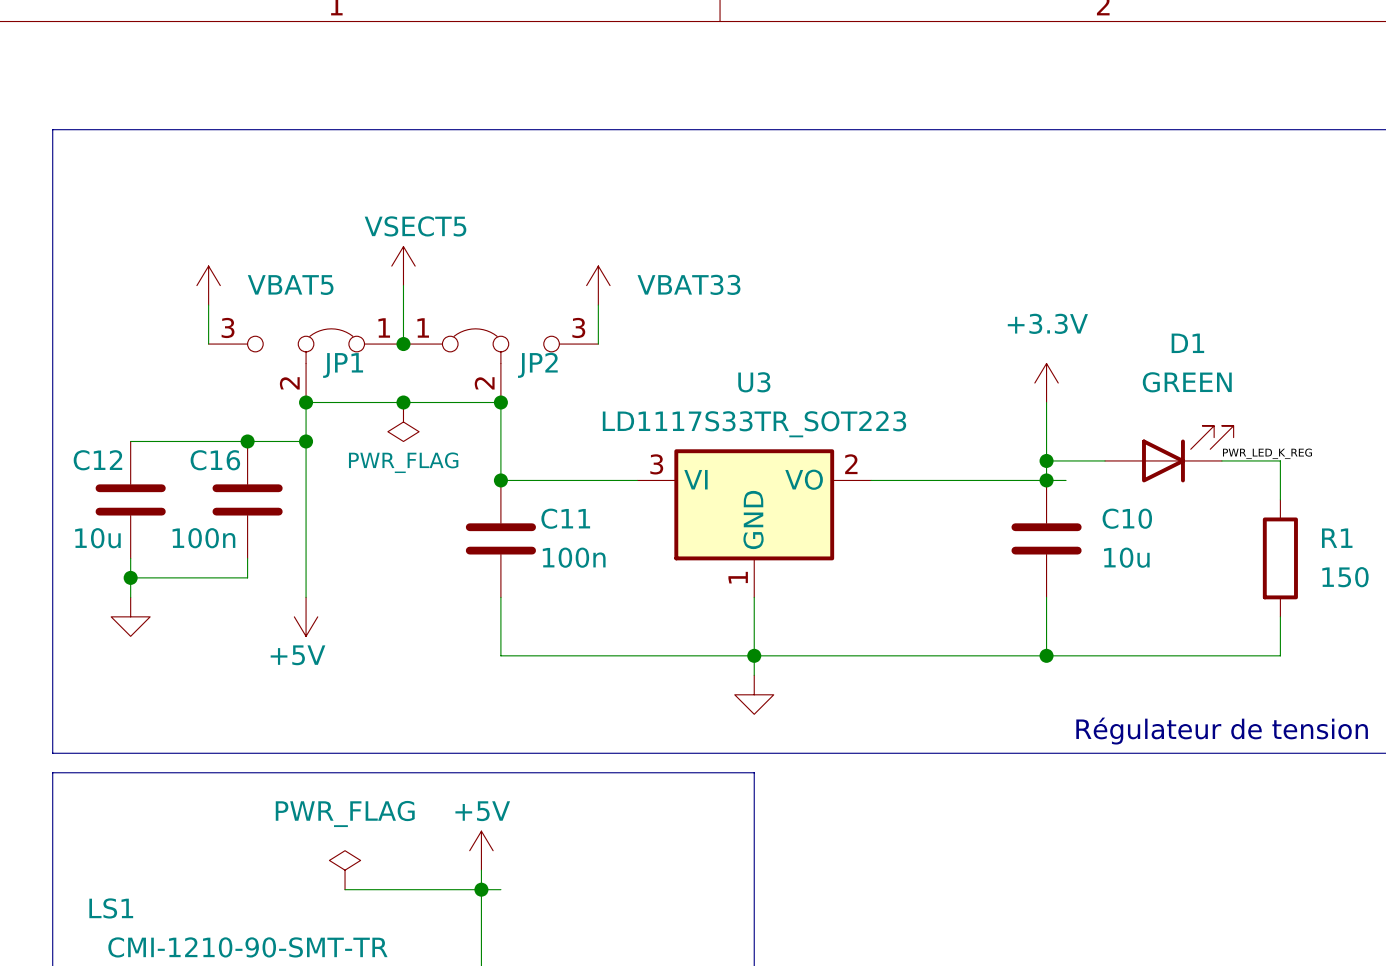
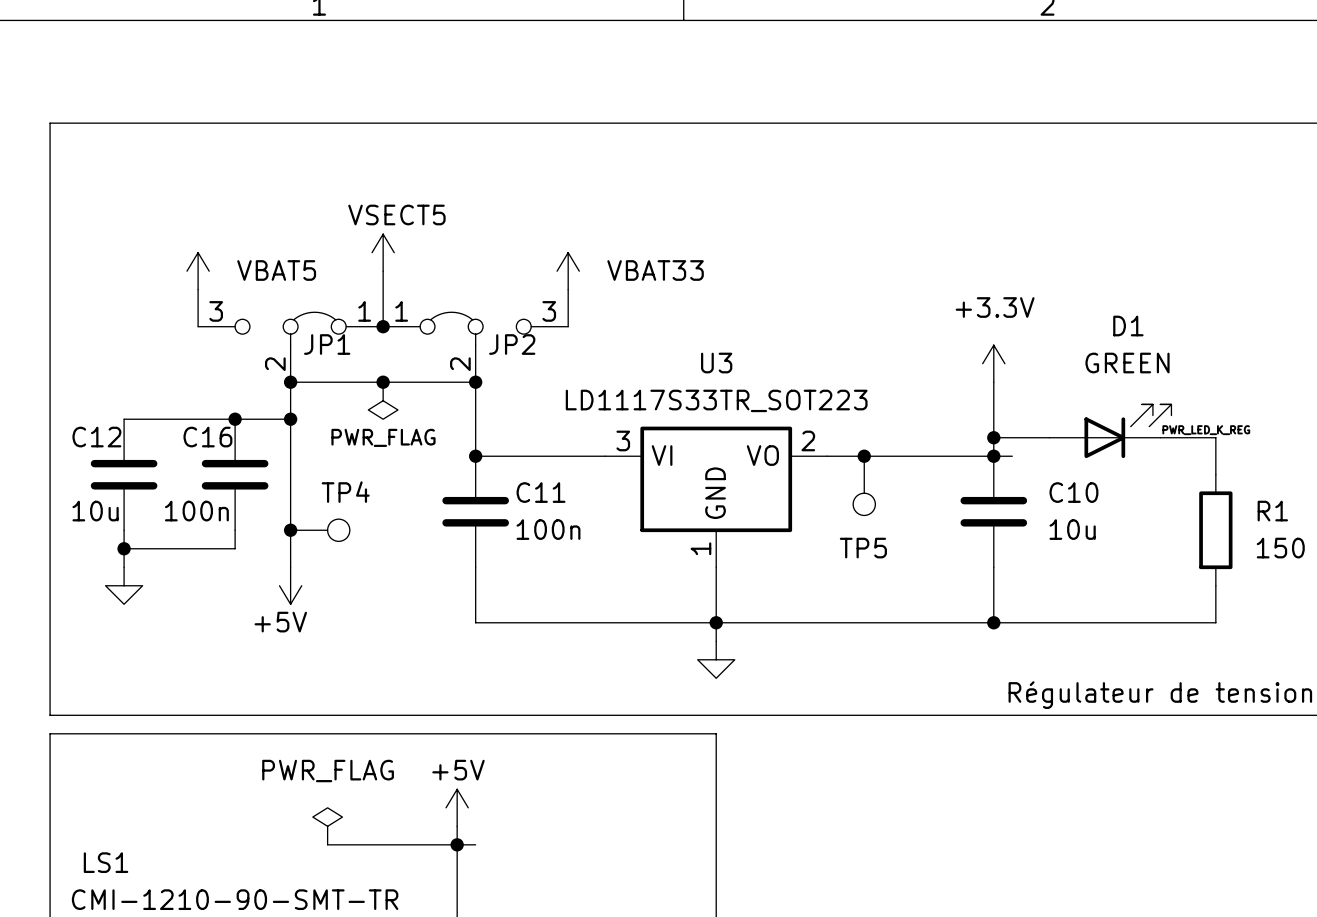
junction: none -> (864, 456)
TP5: none -> (864, 485)
junction: none -> (290, 530)
TP4: none -> (320, 530)

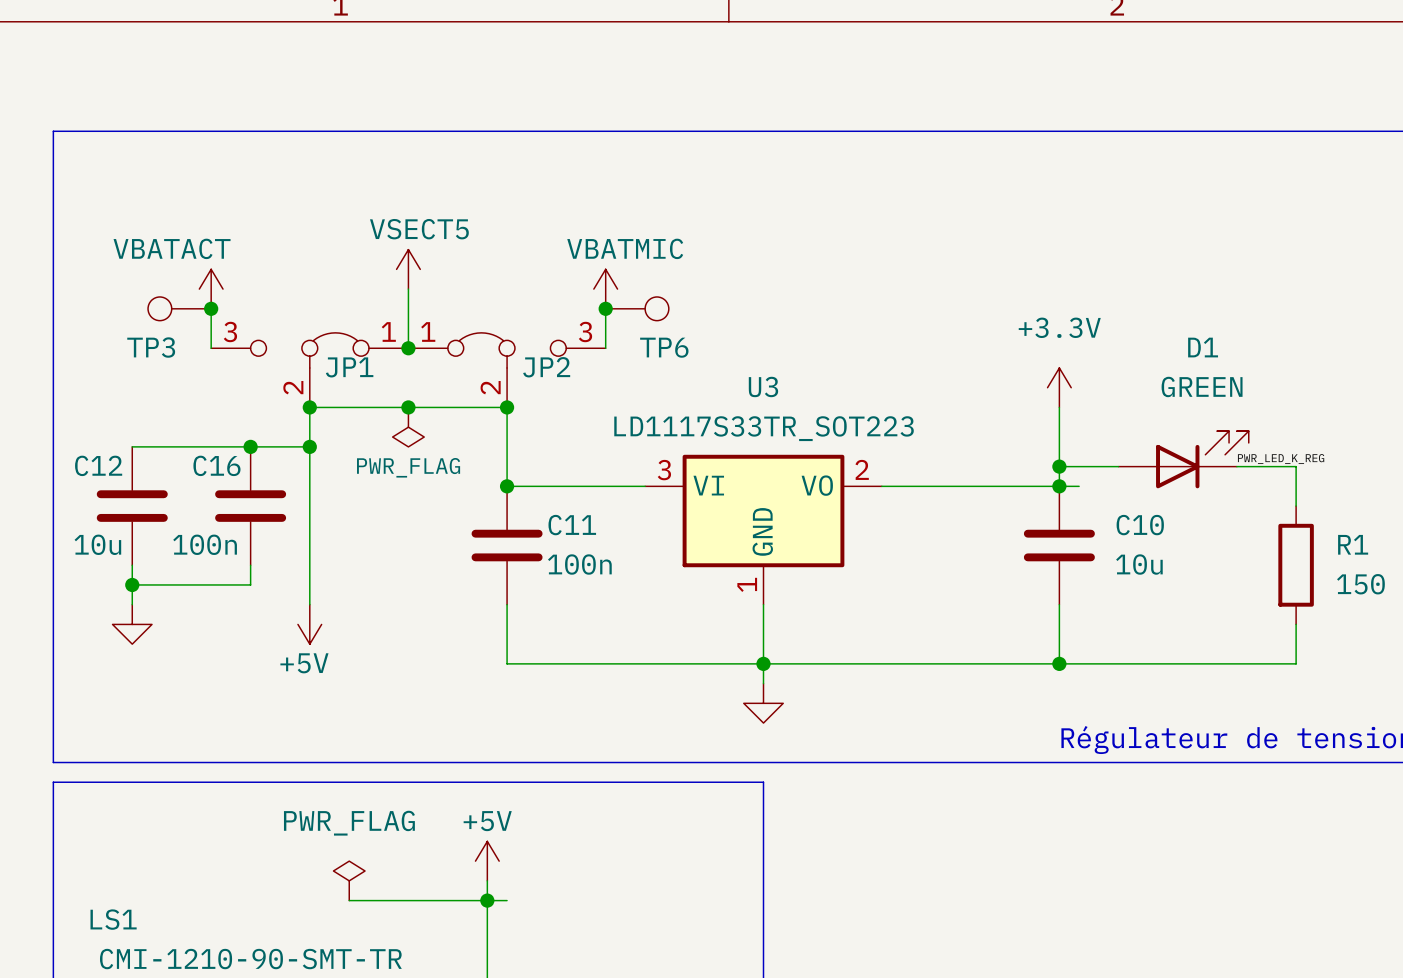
power symbol: VBAT5 (198, 271) -> VBATACT (211, 289)
power symbol: VBAT33 (568, 271) -> VBATMIC (605, 289)
TP3: none -> (179, 308)
junction: none -> (211, 308)
junction: none -> (605, 308)
TP6: none -> (637, 308)
junction: (864, 456) -> none
TP5: (864, 485) -> none
junction: (290, 530) -> none
TP4: (320, 530) -> none

